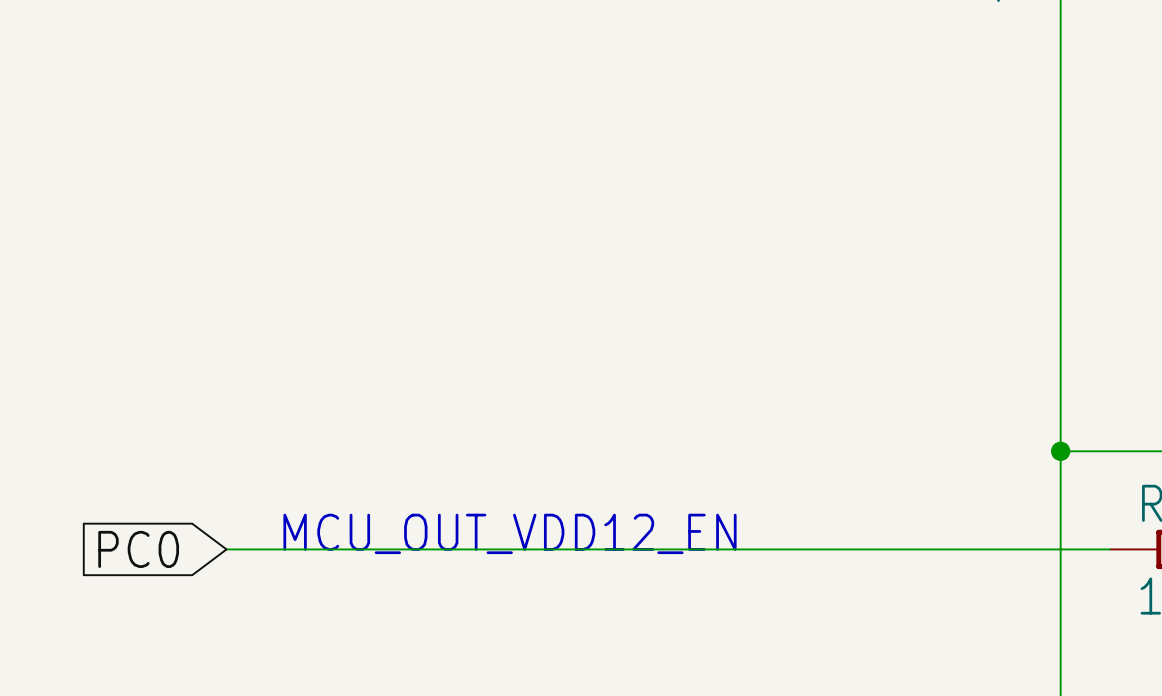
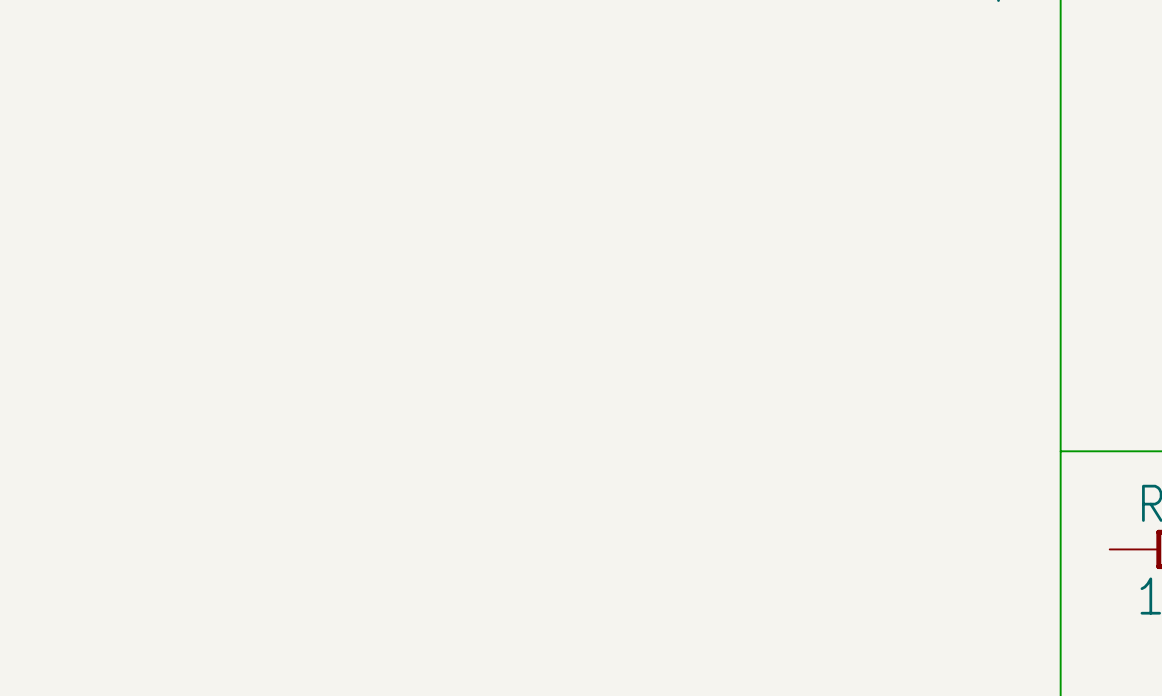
junction: (1060, 451) -> none
text: MCU_OUT_VDD12_EN (510, 533) -> none
global label: PC0 (138, 549) -> none
wire: (226, 549) (1109, 549) -> none

